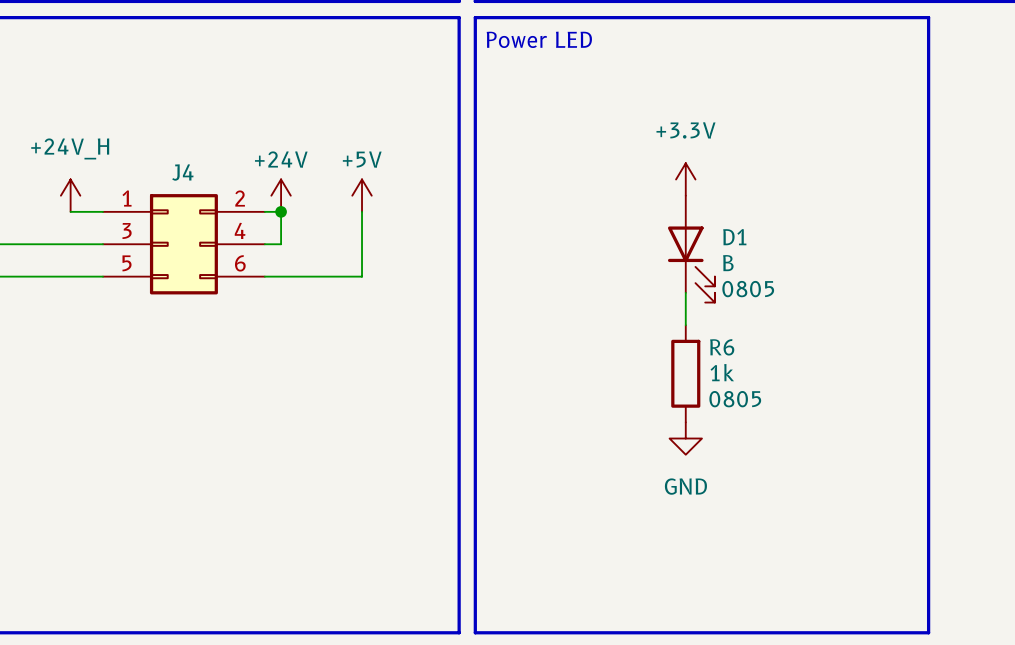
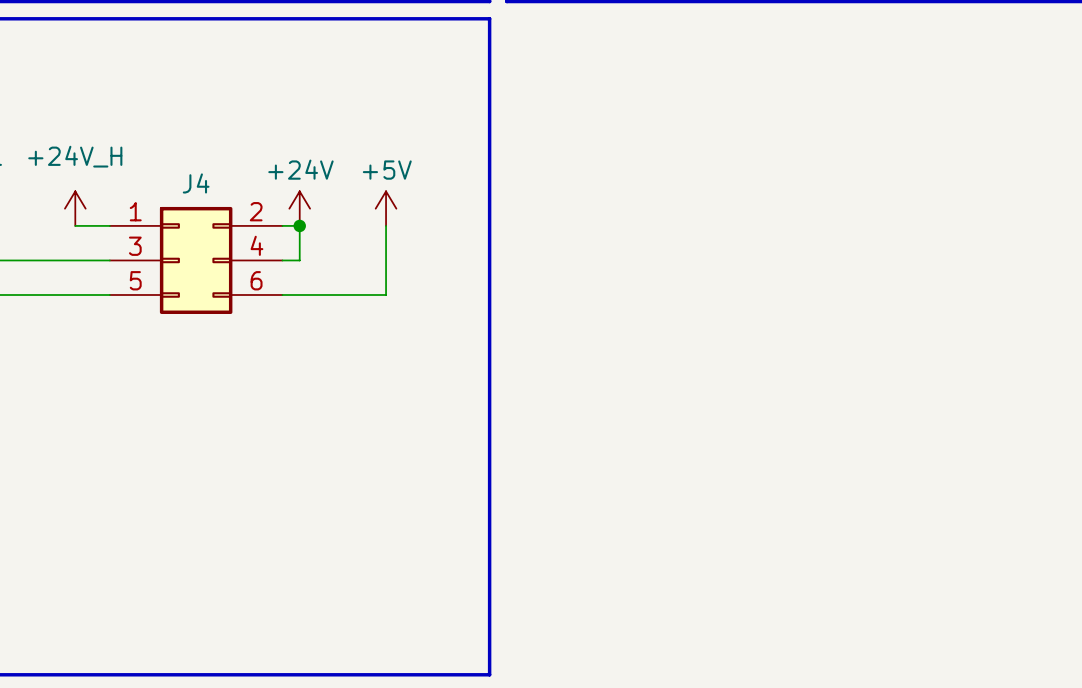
line: (475, 17) (928, 17) (928, 632) (475, 632) (475, 17) -> none
text: Power LED (539, 39) -> none
power symbol: +3.3V (685, 179) -> none
D1: B (691, 249) -> none
wire: (685, 292) (685, 325) -> none
R6: 1k (685, 373) -> none
power symbol: GND (685, 438) -> none

